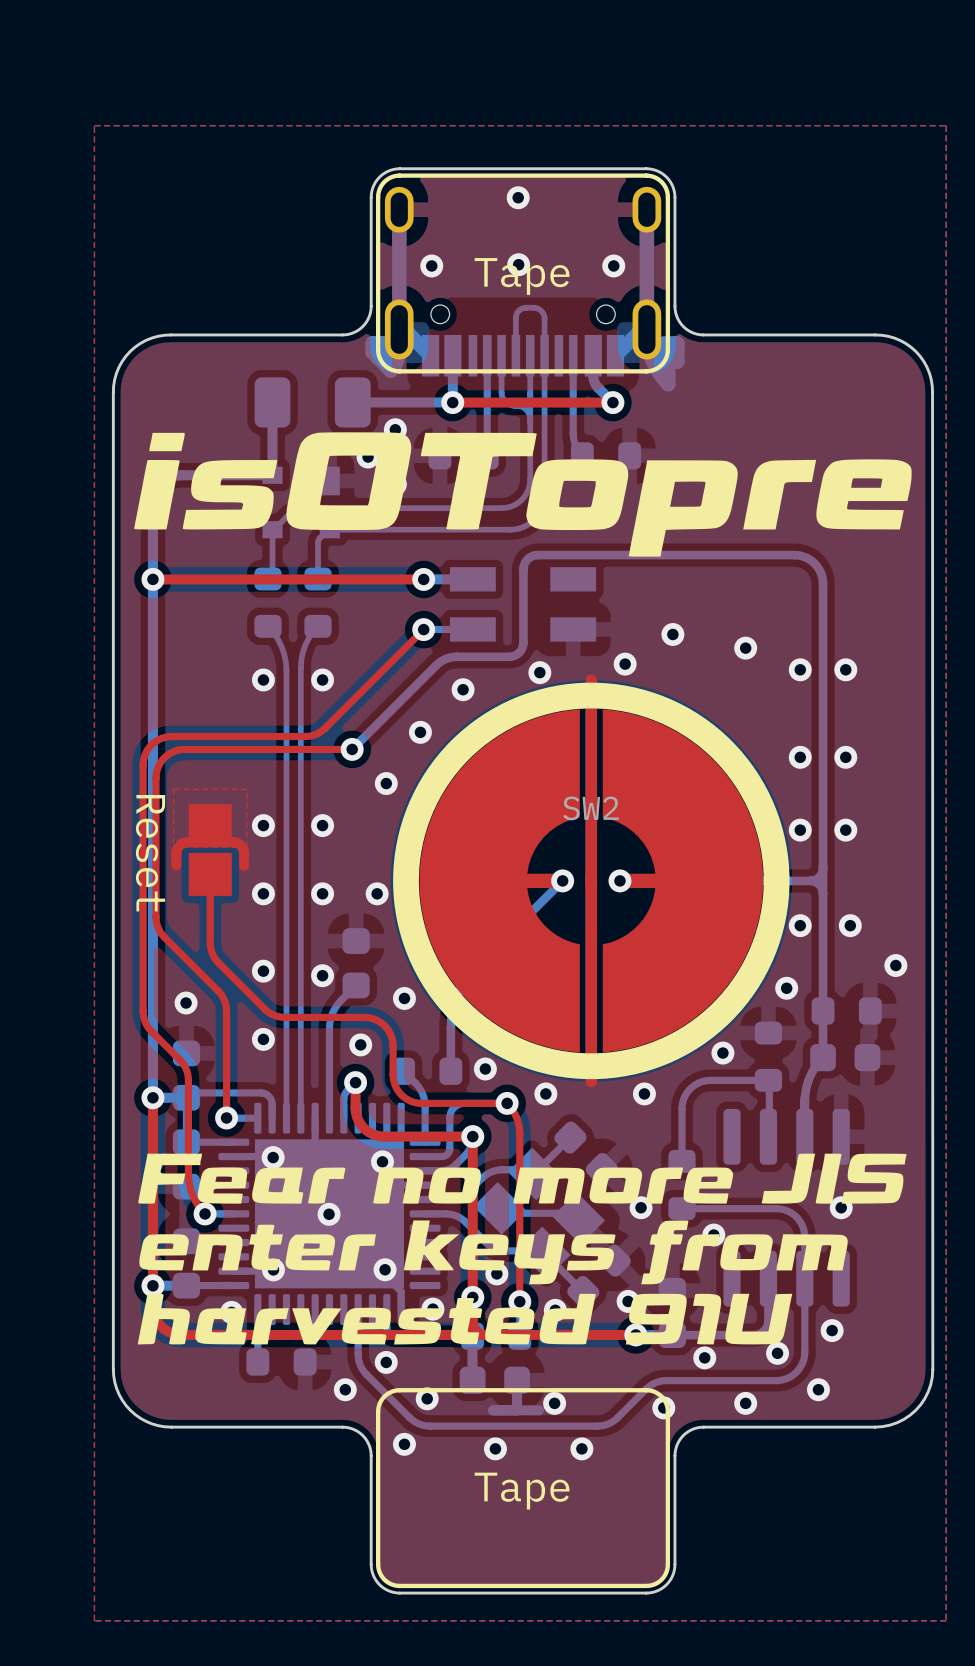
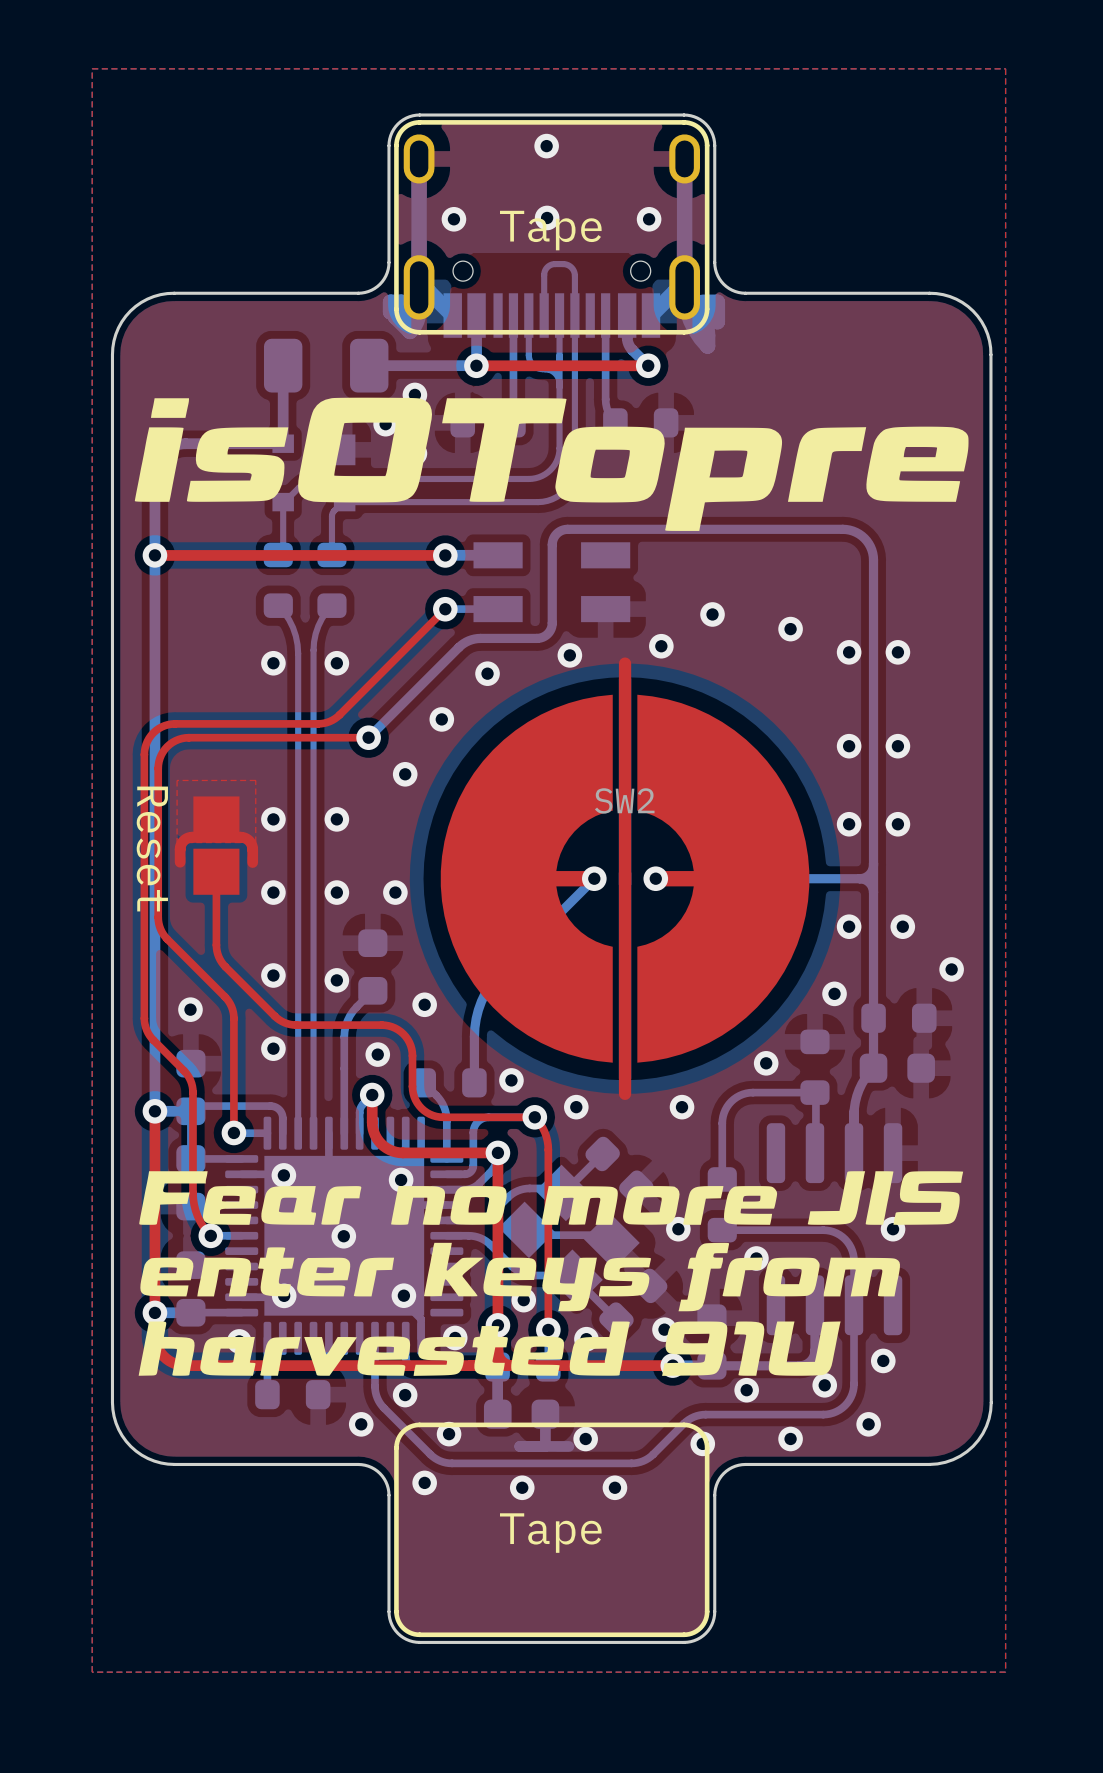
SW2 footprint: [393, 674, 790, 1088] -> [440, 657, 810, 1100]

